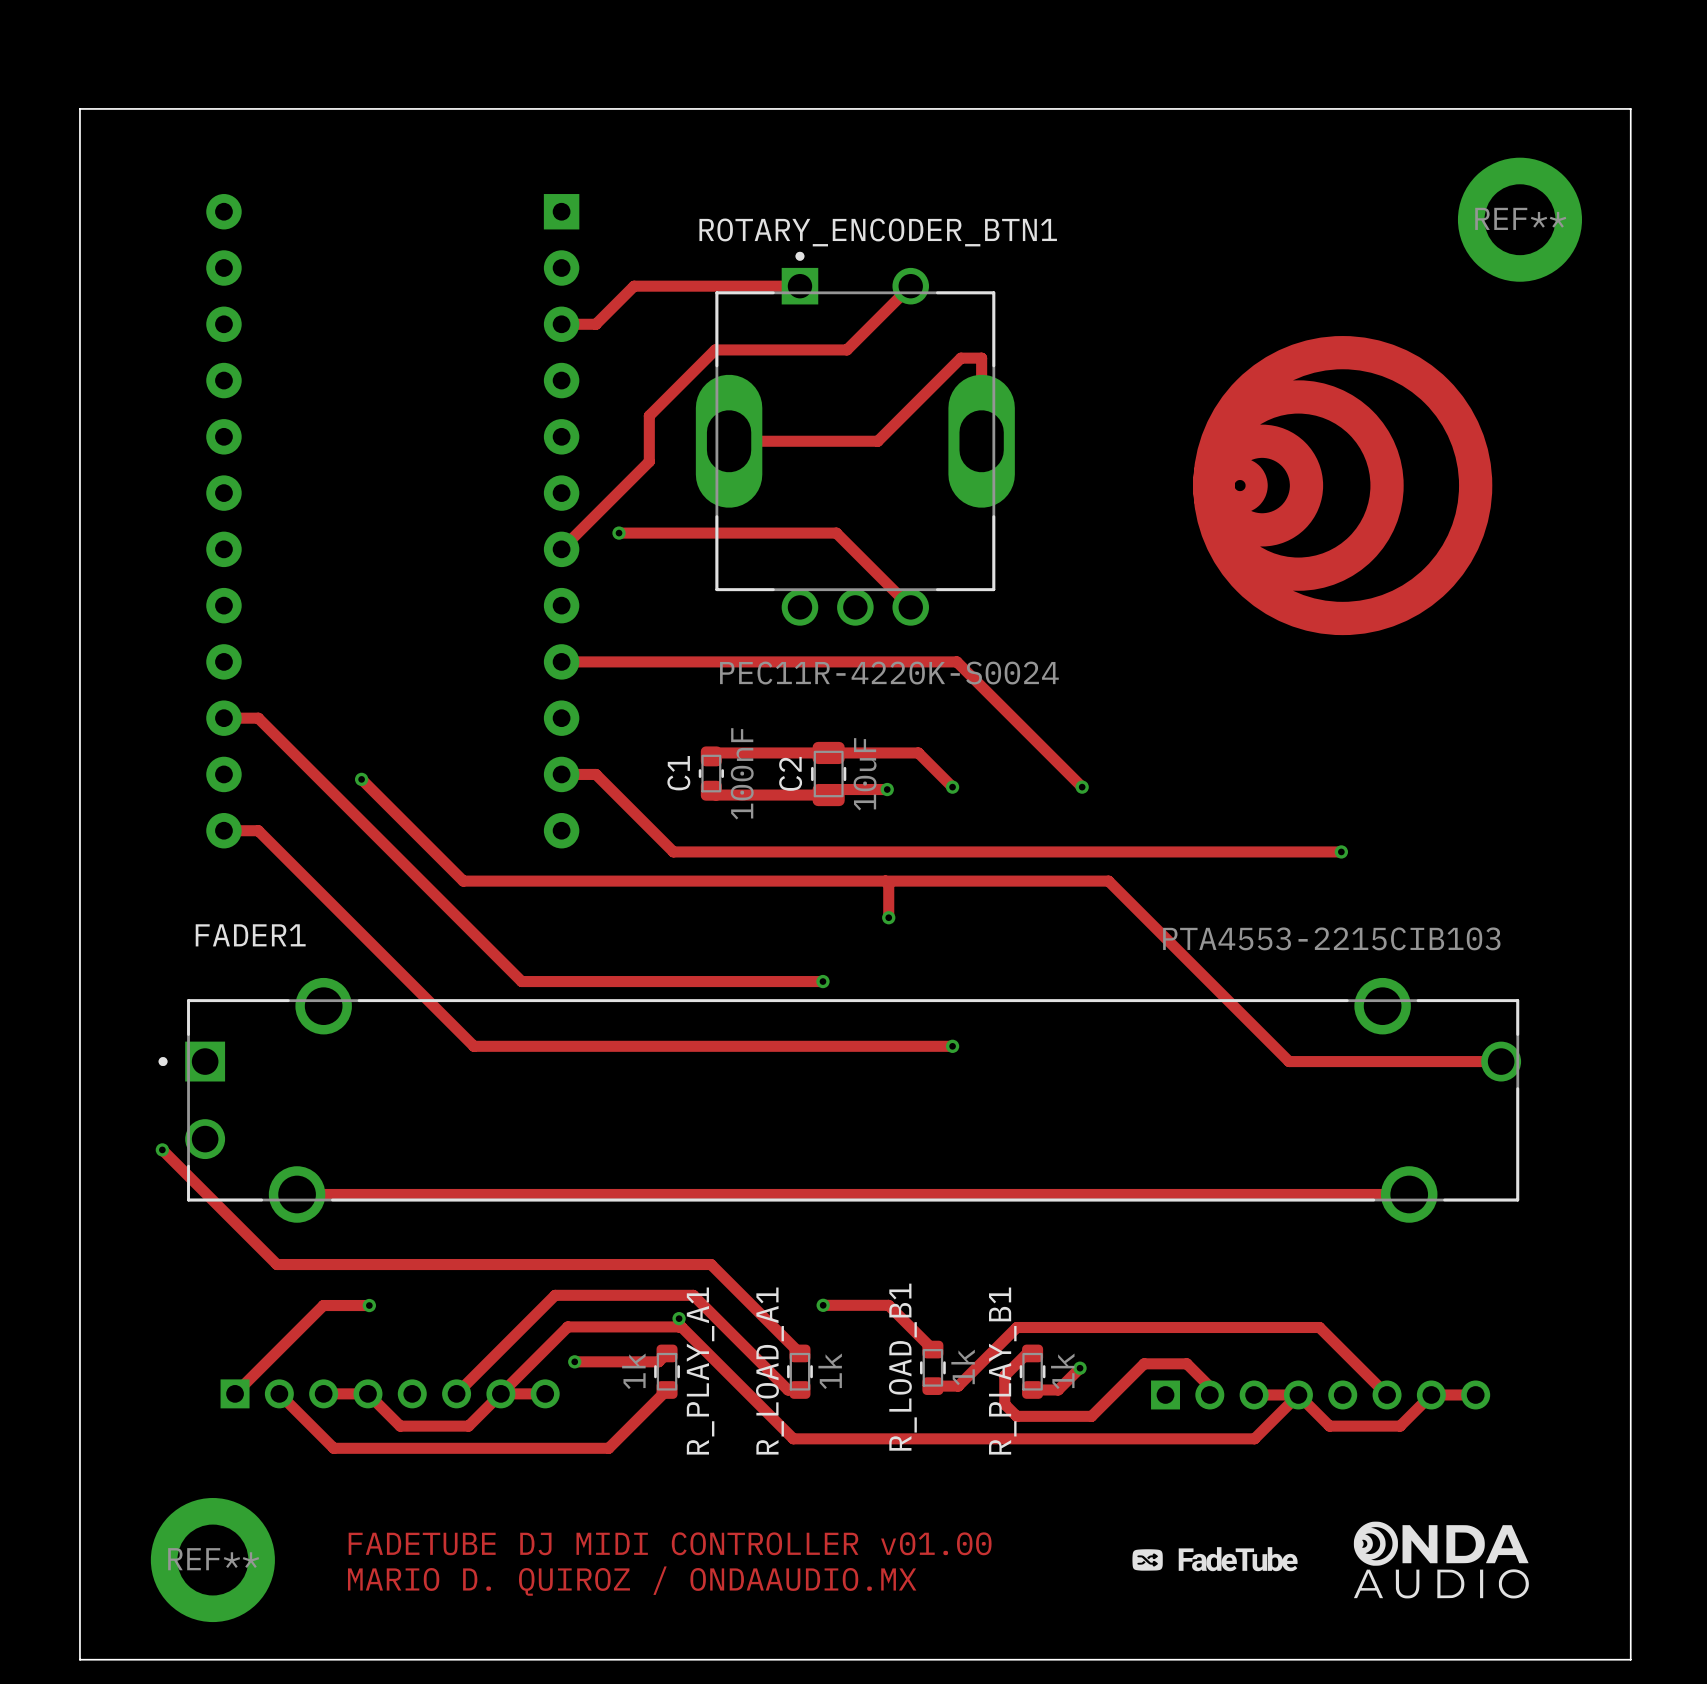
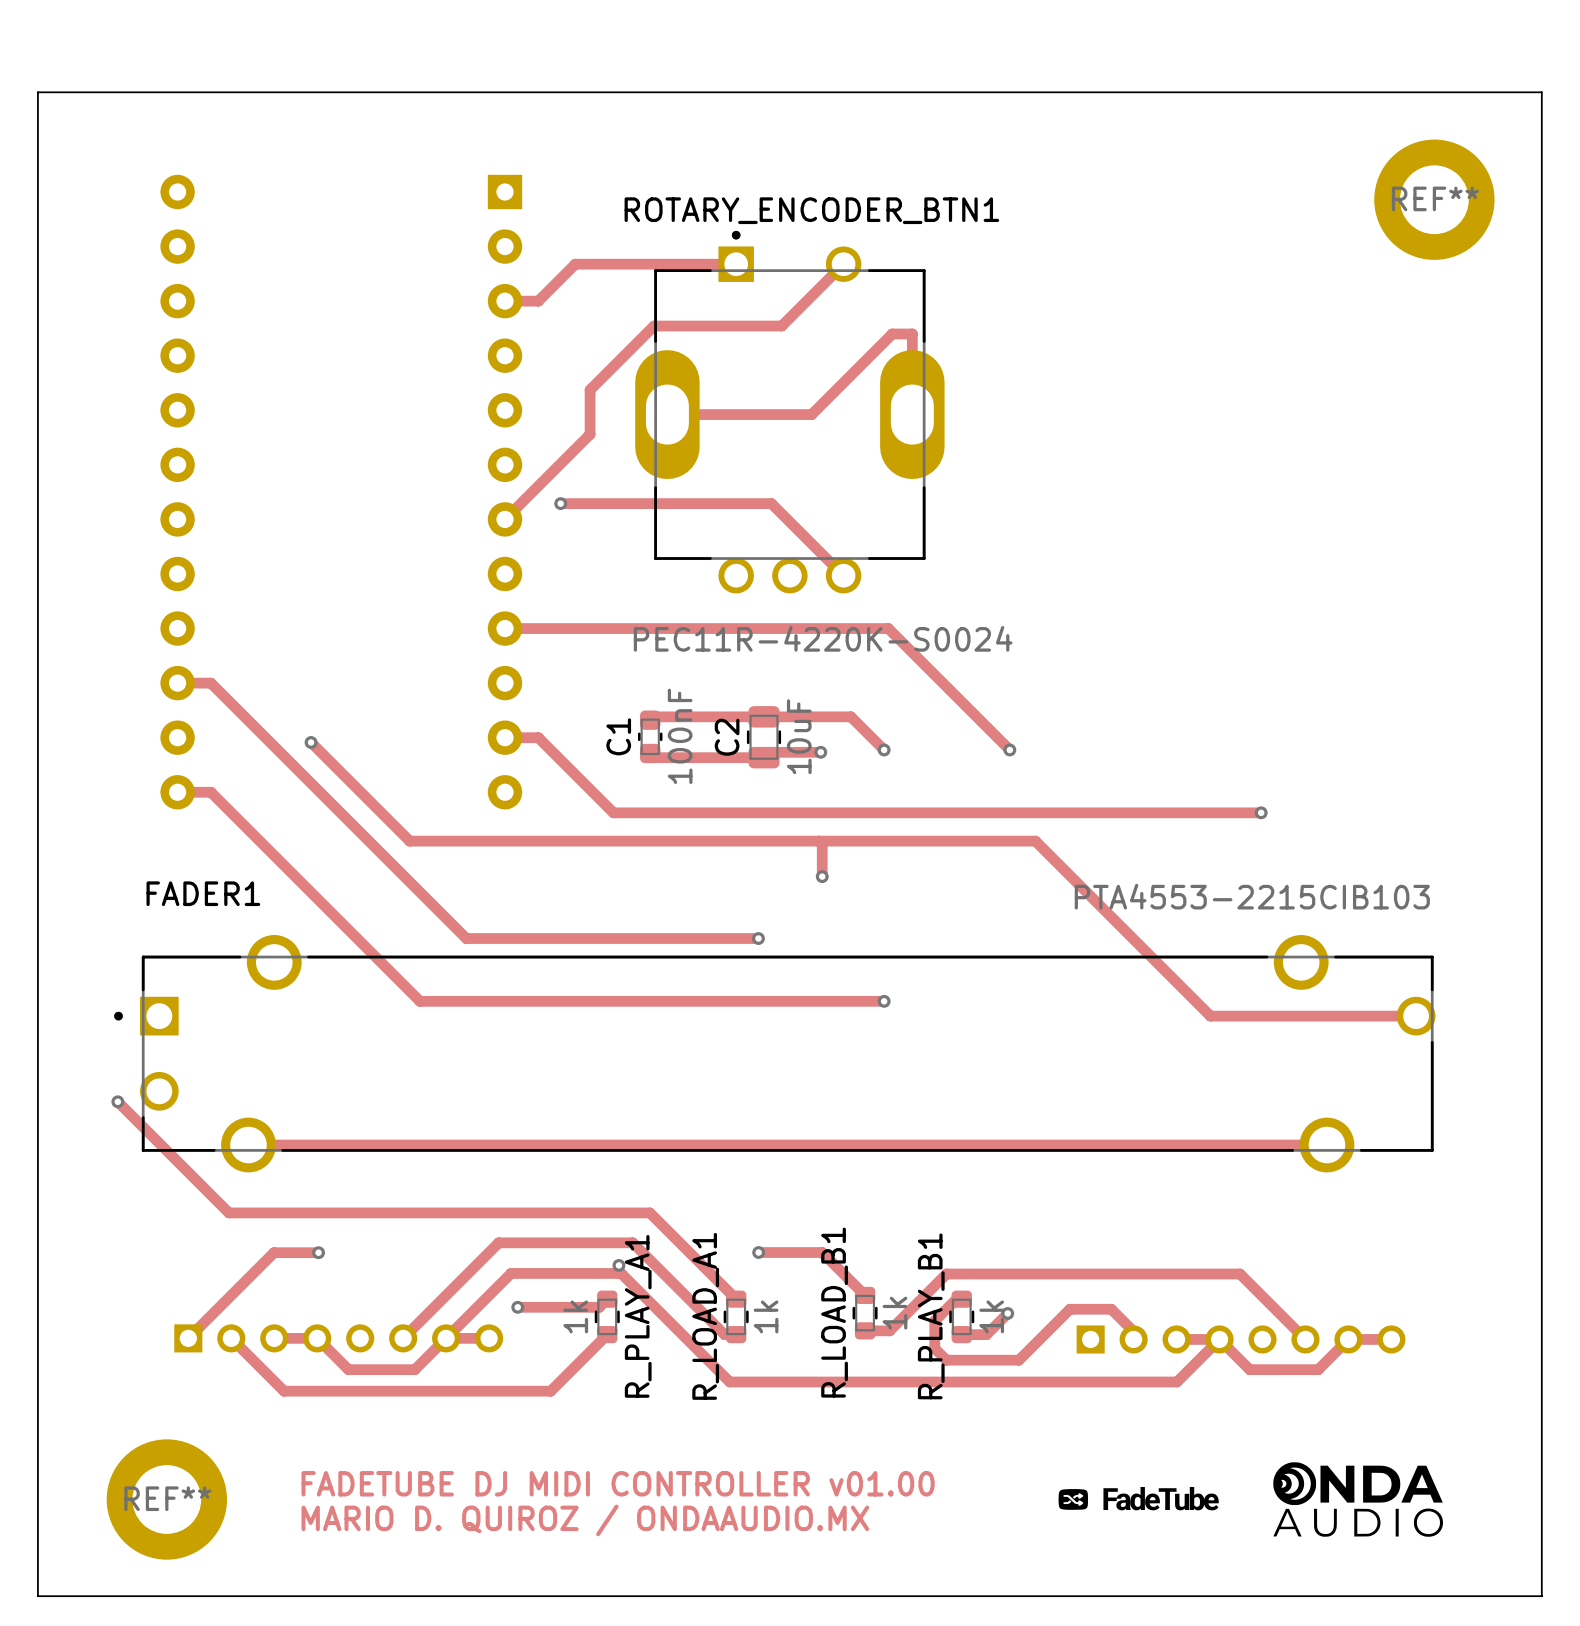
drawing: [1193, 336, 1493, 636] -> none

